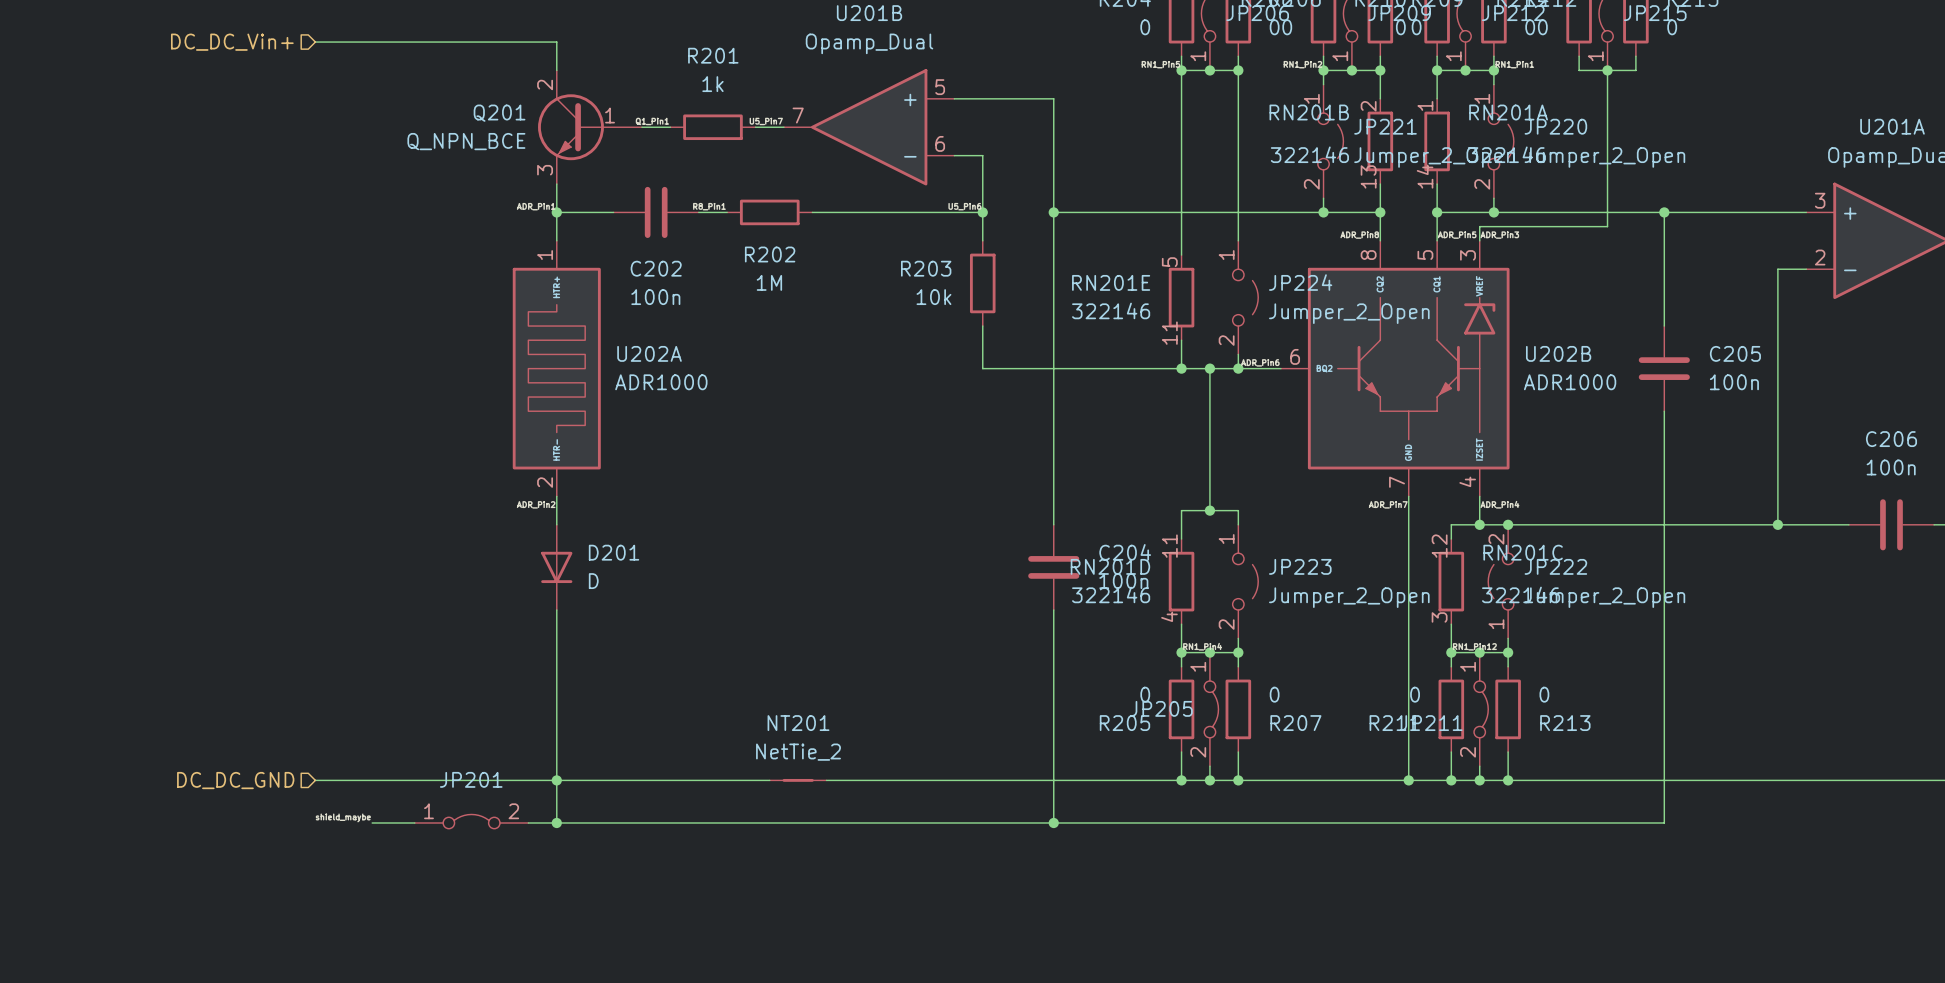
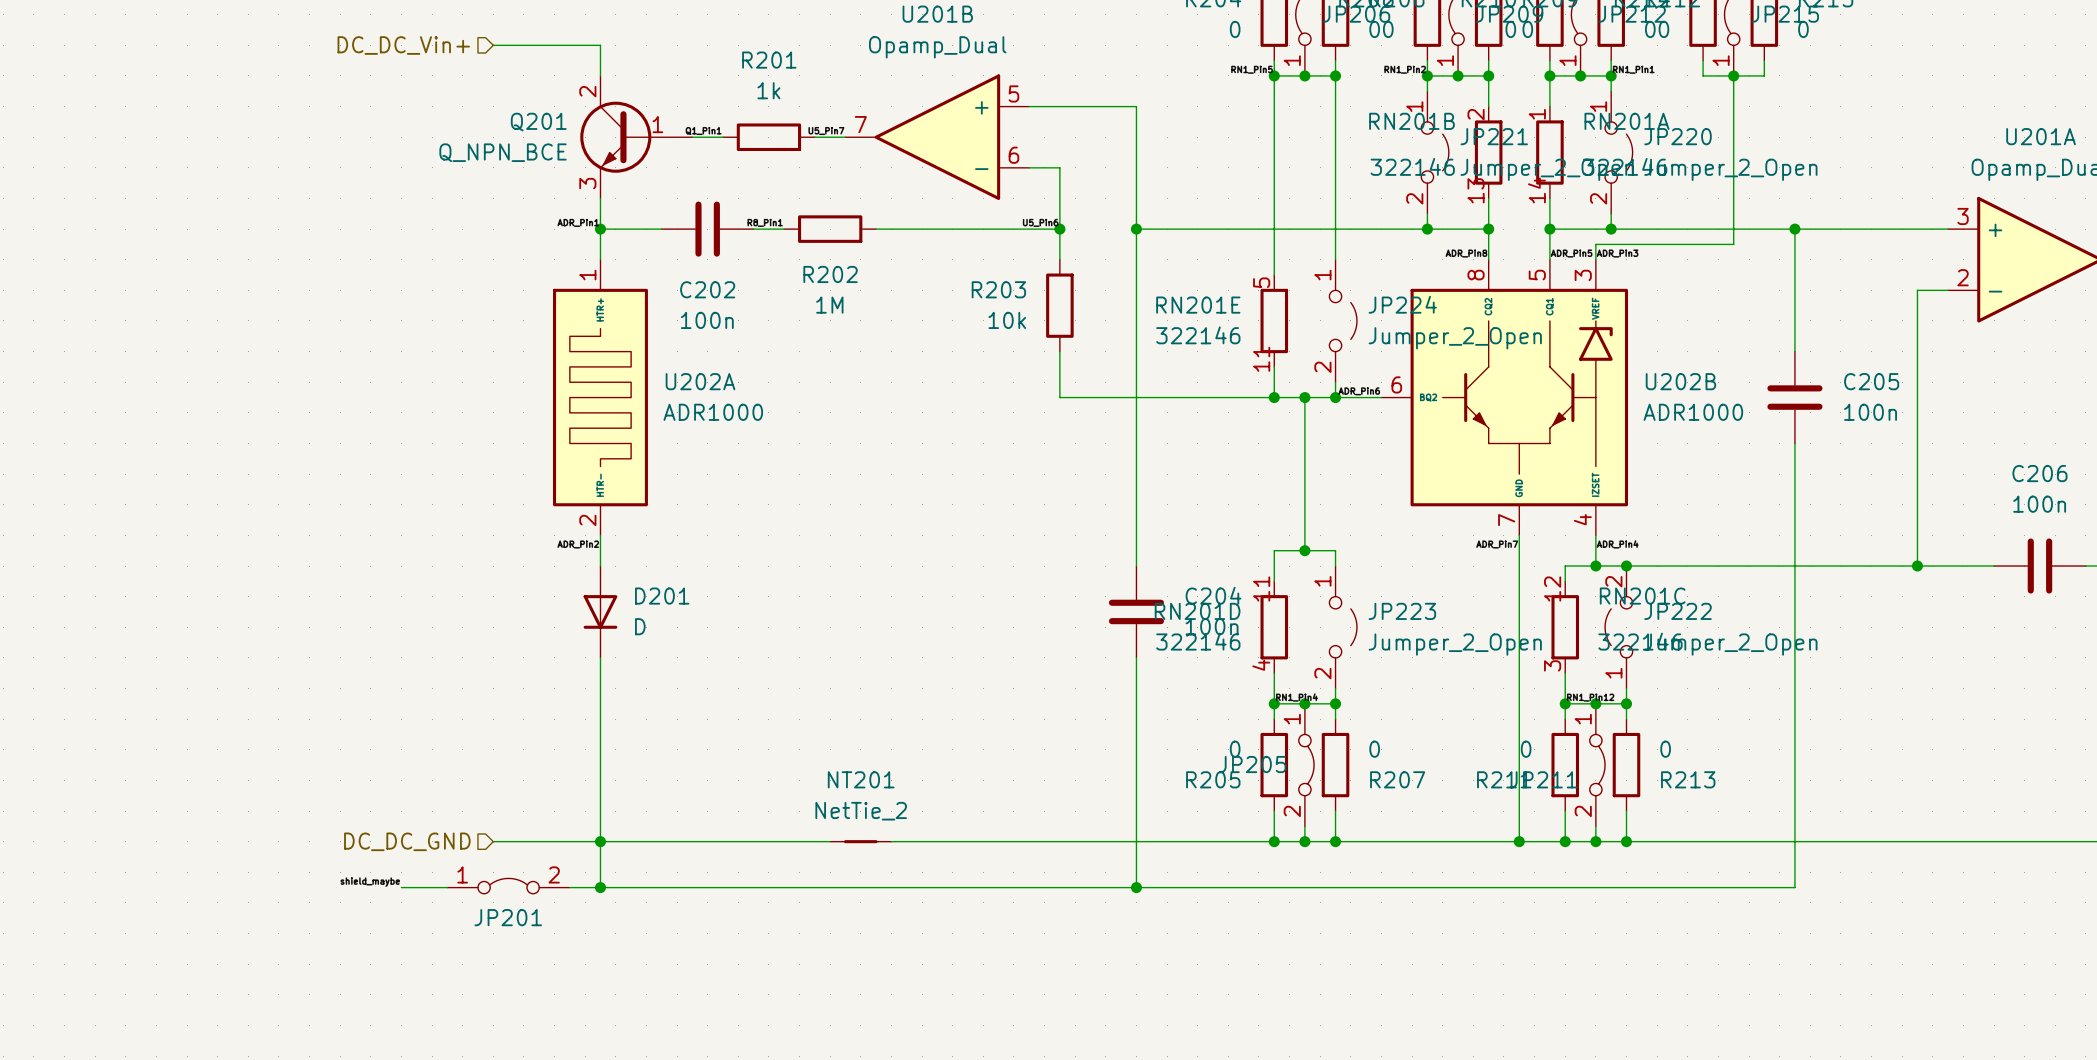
hierarchical label position: DC_DC_Vin+ (232, 42) -> DC_DC_Vin+ (403, 45)
wire: (315, 42) (457, 42) -> none
JP201 name position: JP201 (471, 779) -> JP201 (508, 917)
hierarchical label position: DC_DC_GND (235, 780) -> DC_DC_GND (407, 841)
wire: (315, 780) (457, 780) -> none

